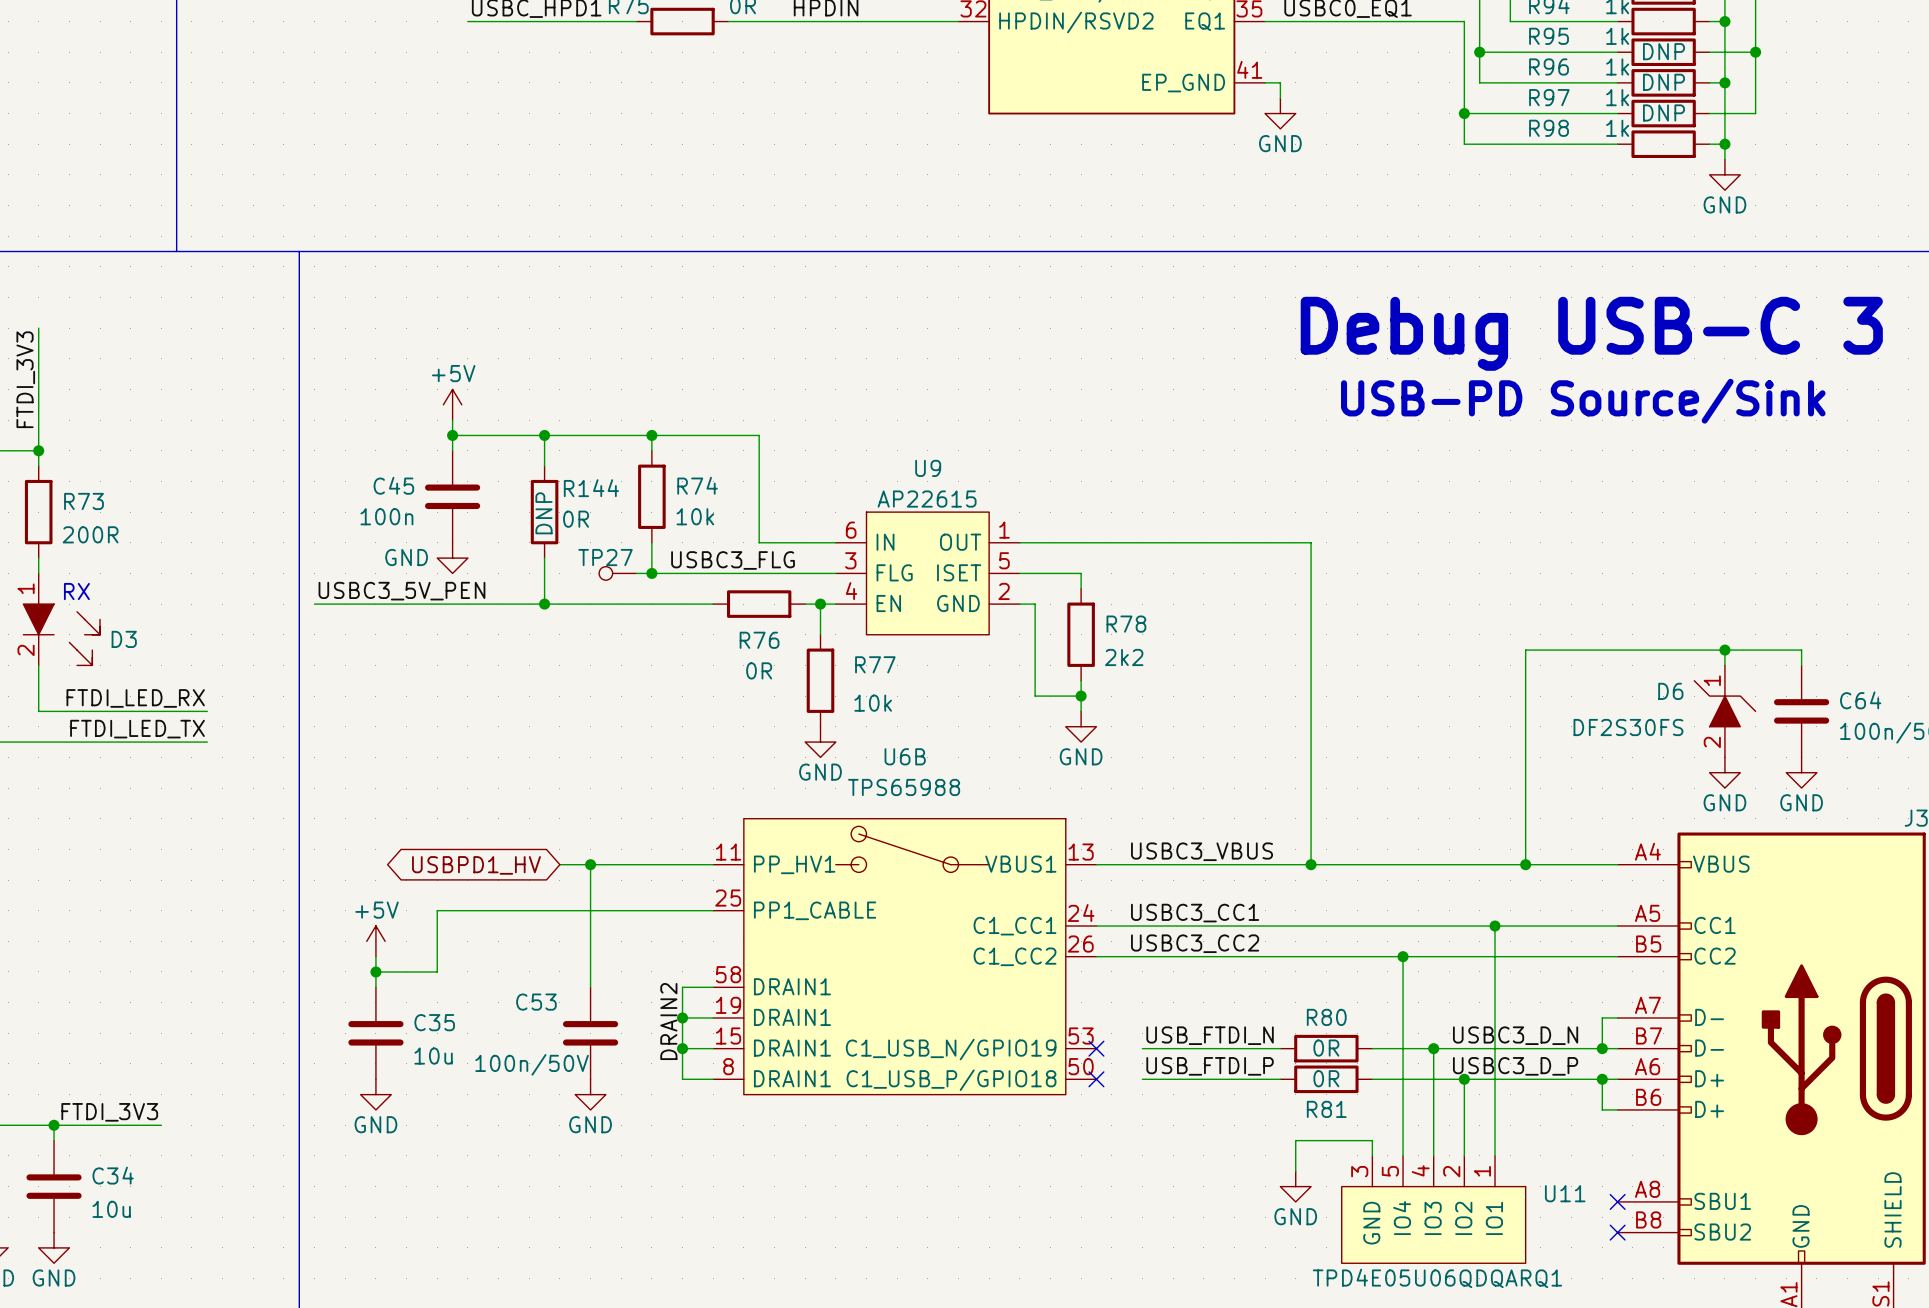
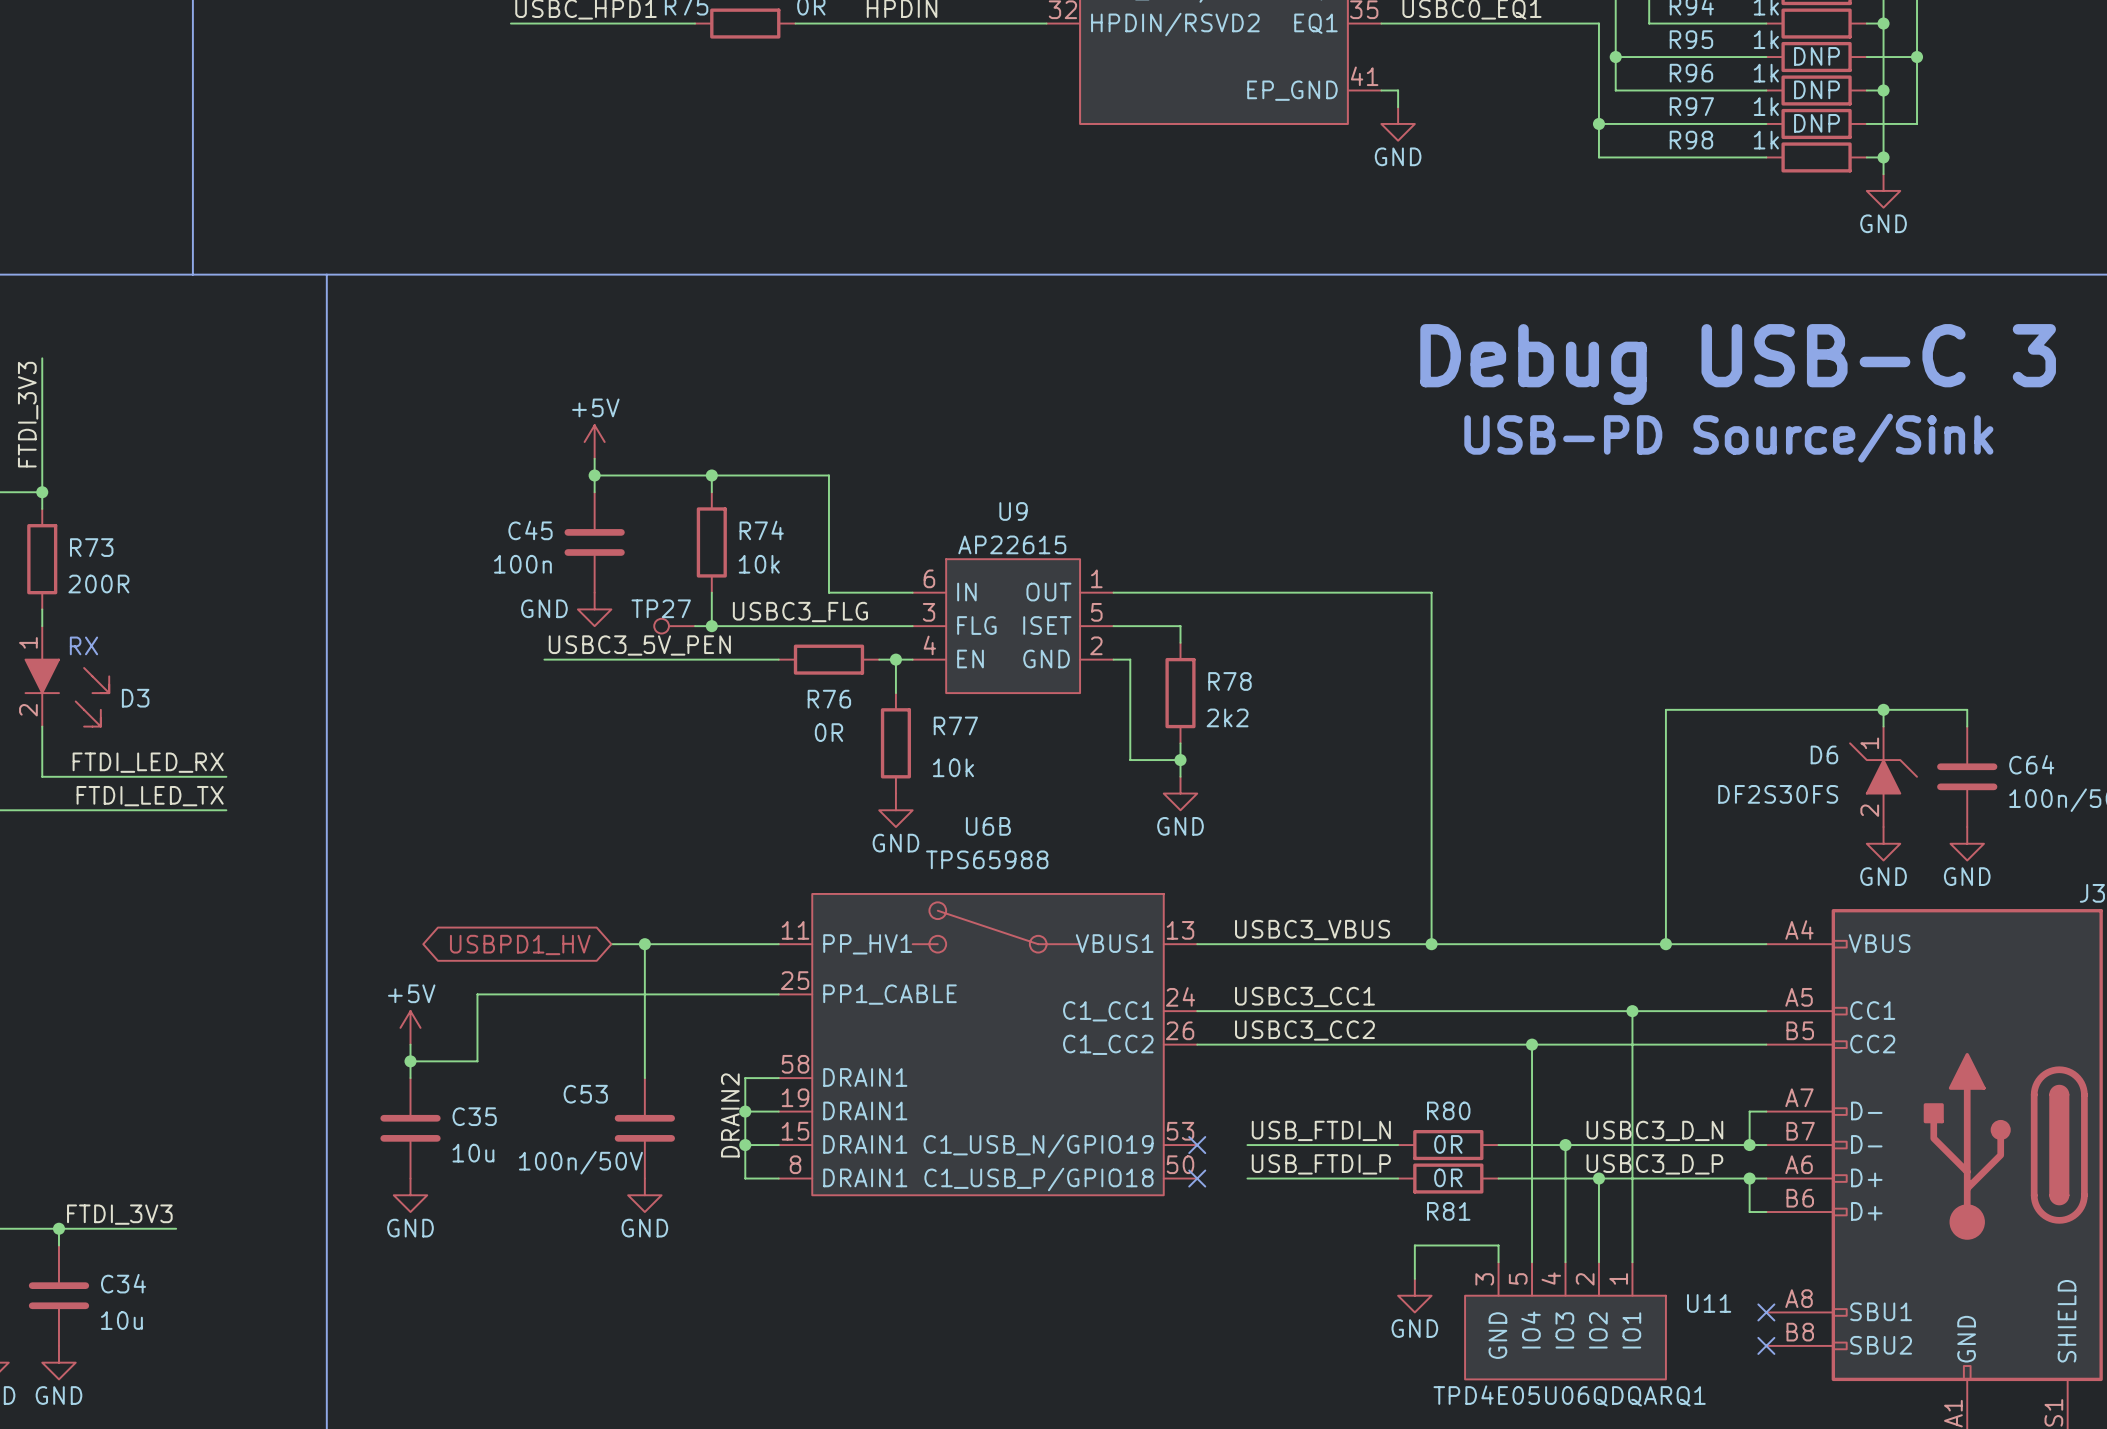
power symbol position: +5V (452, 404) -> +5V (594, 442)
wire: (452, 420) (452, 450) -> none
wire: (452, 435) (544, 435) -> (594, 458) (594, 475)
junction: (452, 435) -> none
C45 position: (452, 496) -> (594, 542)
R144: (544, 512) -> none
power symbol position: GND (452, 558) -> GND (594, 609)
wire: (544, 558) (544, 604) -> none
label position: USBC3_5V_PEN (401, 591) -> USBC3_5V_PEN (639, 645)
wire: (314, 604) (498, 604) -> none
junction: (544, 604) -> none

